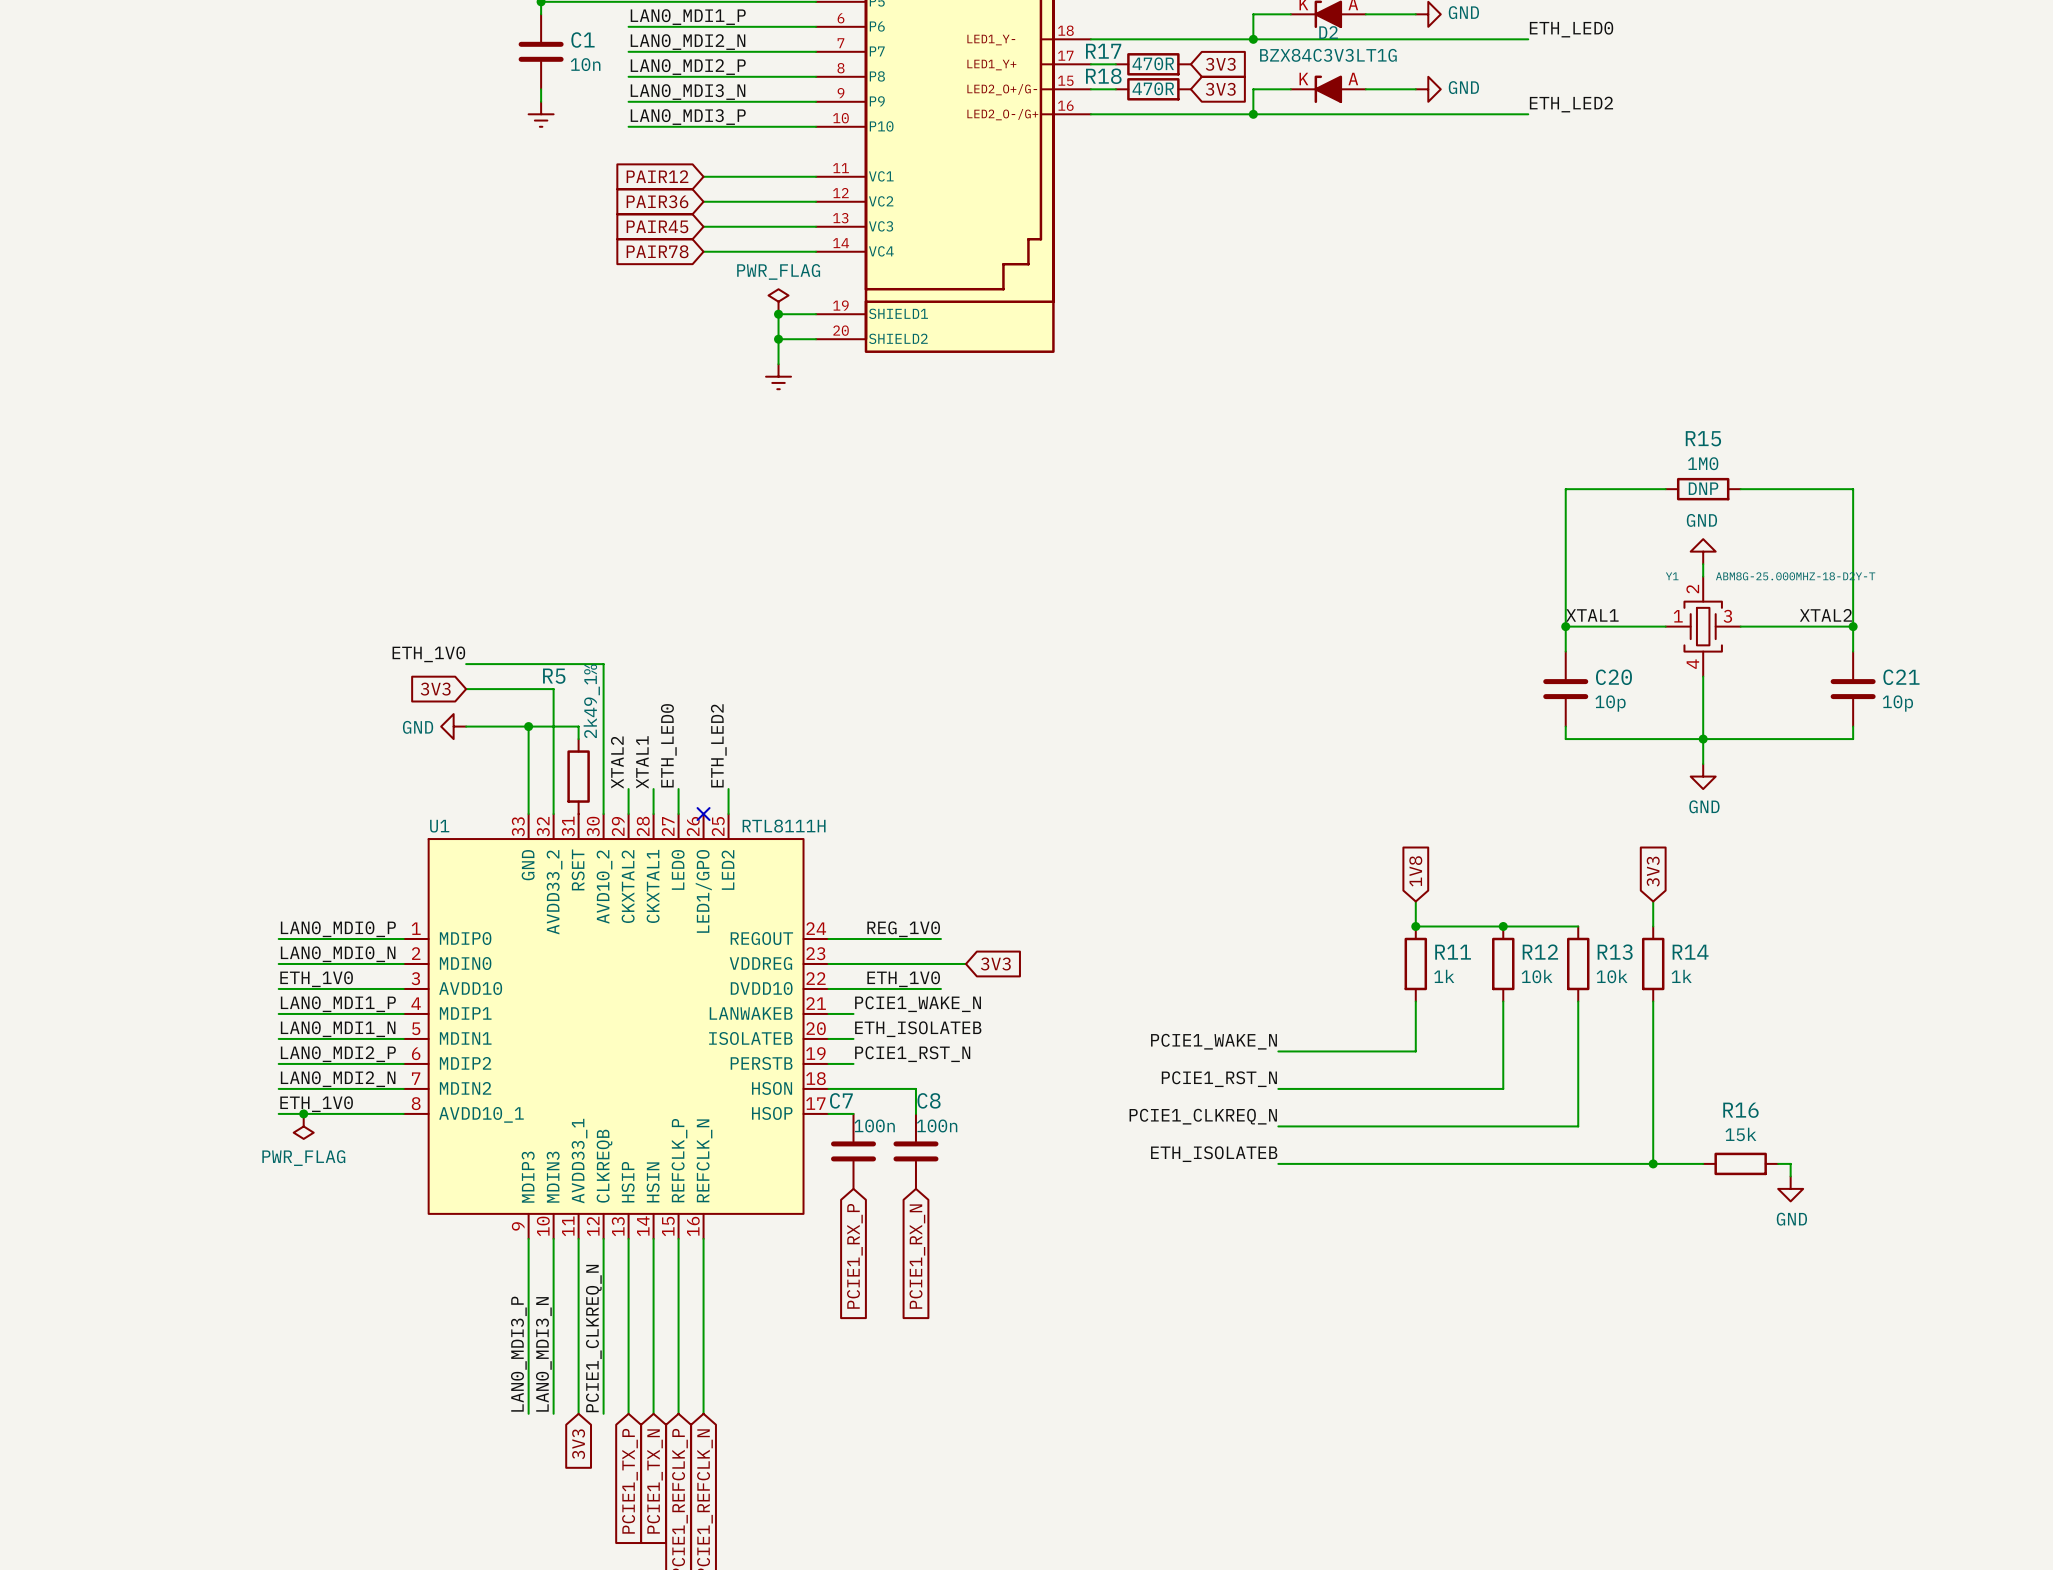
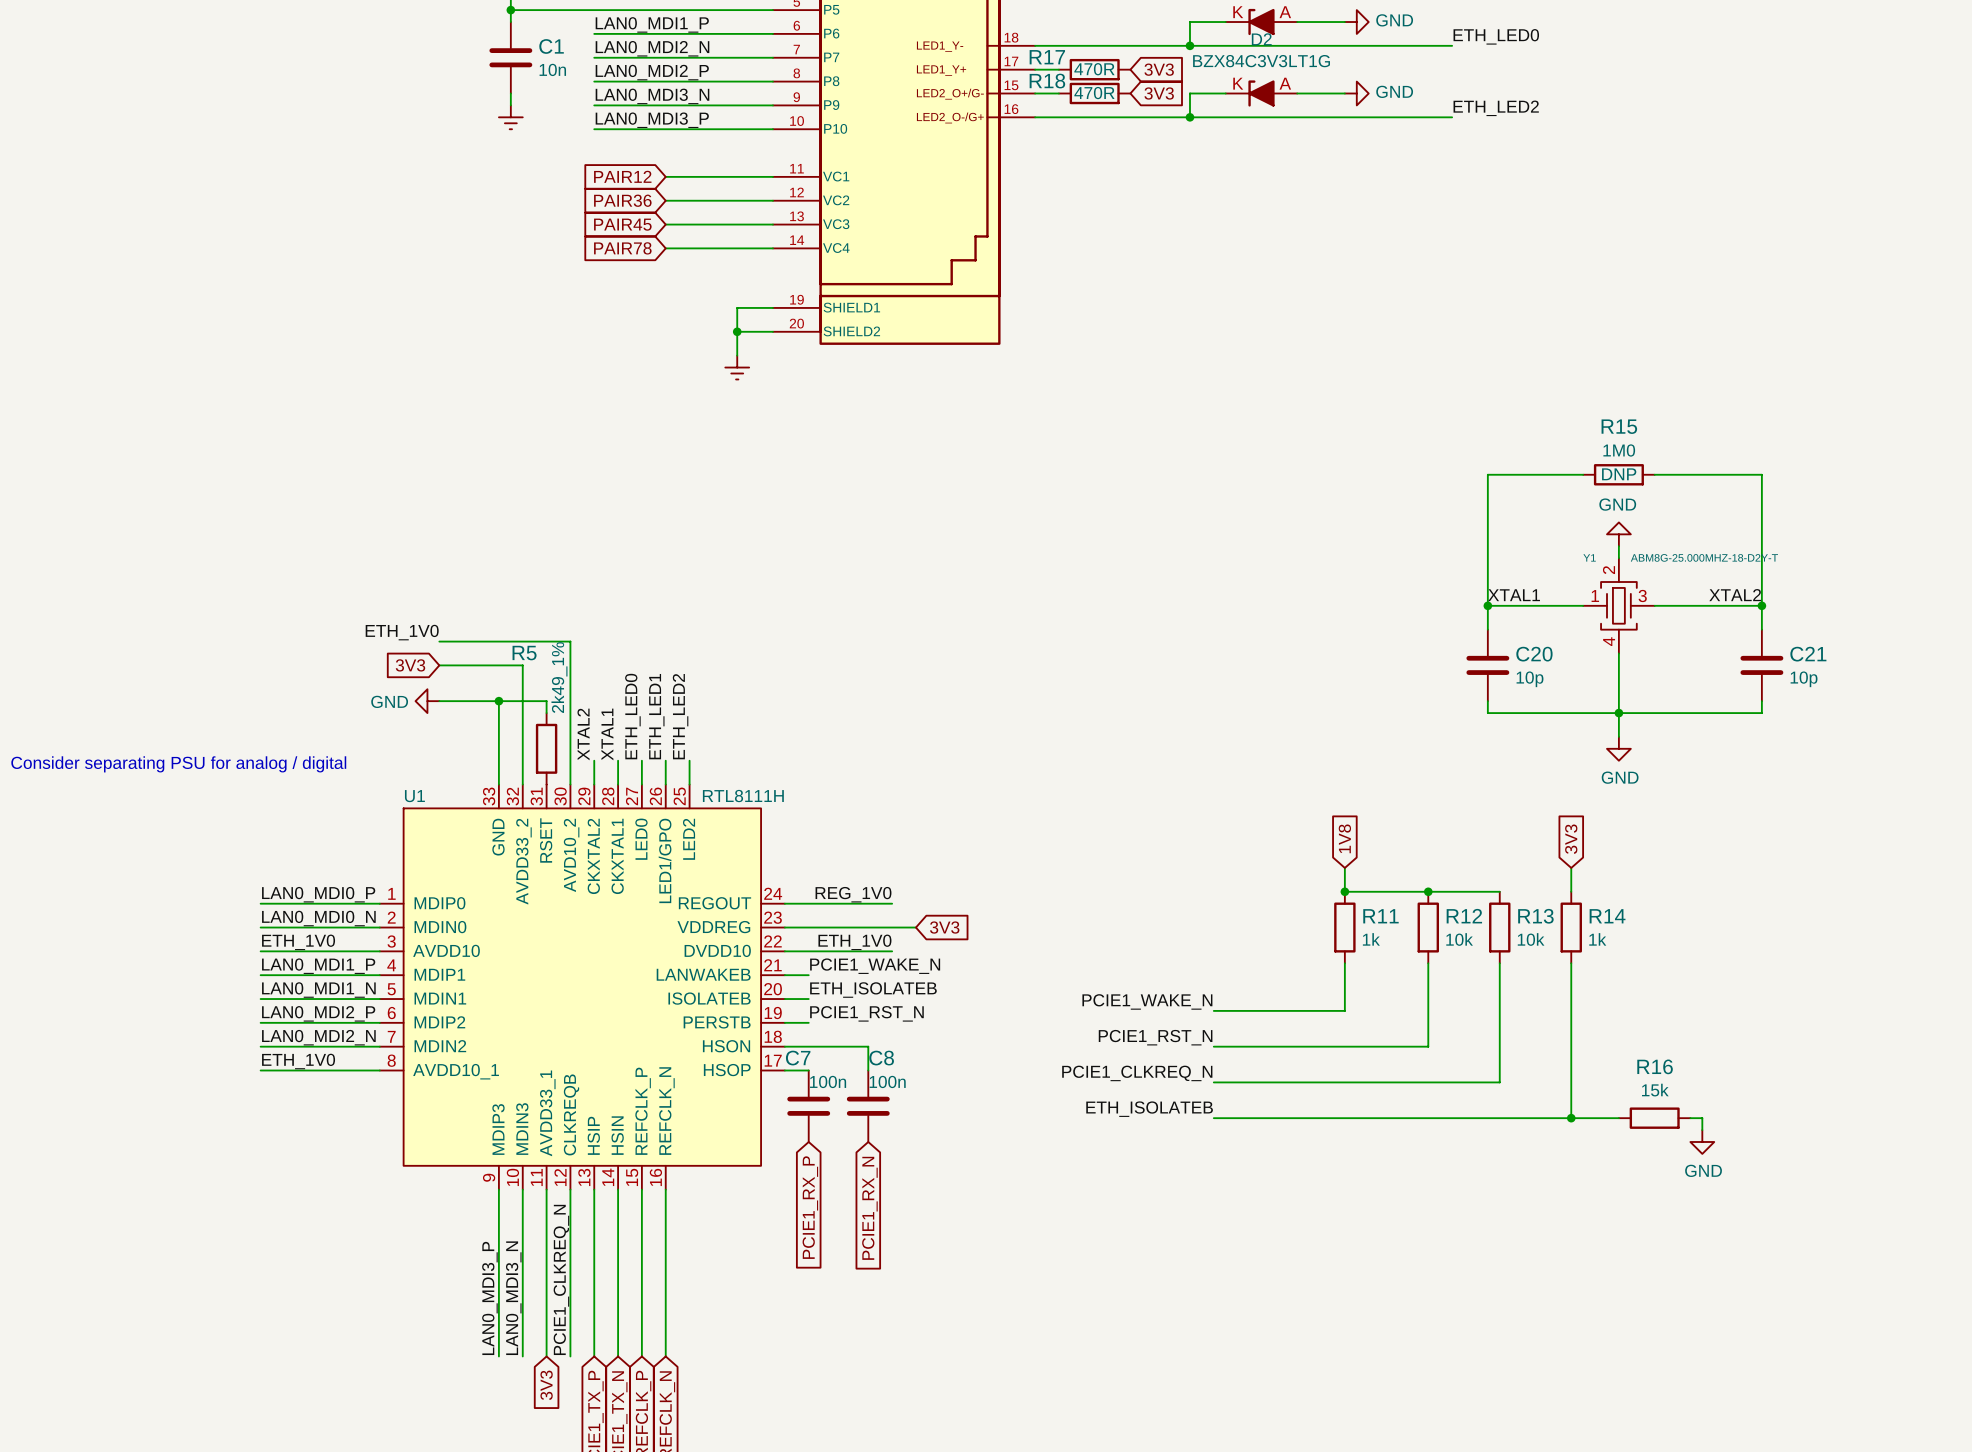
power symbol: PWR_FLAG (778, 301) -> none
junction: (778, 314) -> none
label: none -> ETH_LED1 (656, 716)
wire: none -> (665, 760) (665, 784)
text: none -> Consider separating PSU for analog / digital (178, 764)
no-connect mark: (703, 814) -> none
junction: (303, 1113) -> none
power symbol: PWR_FLAG (303, 1126) -> none

